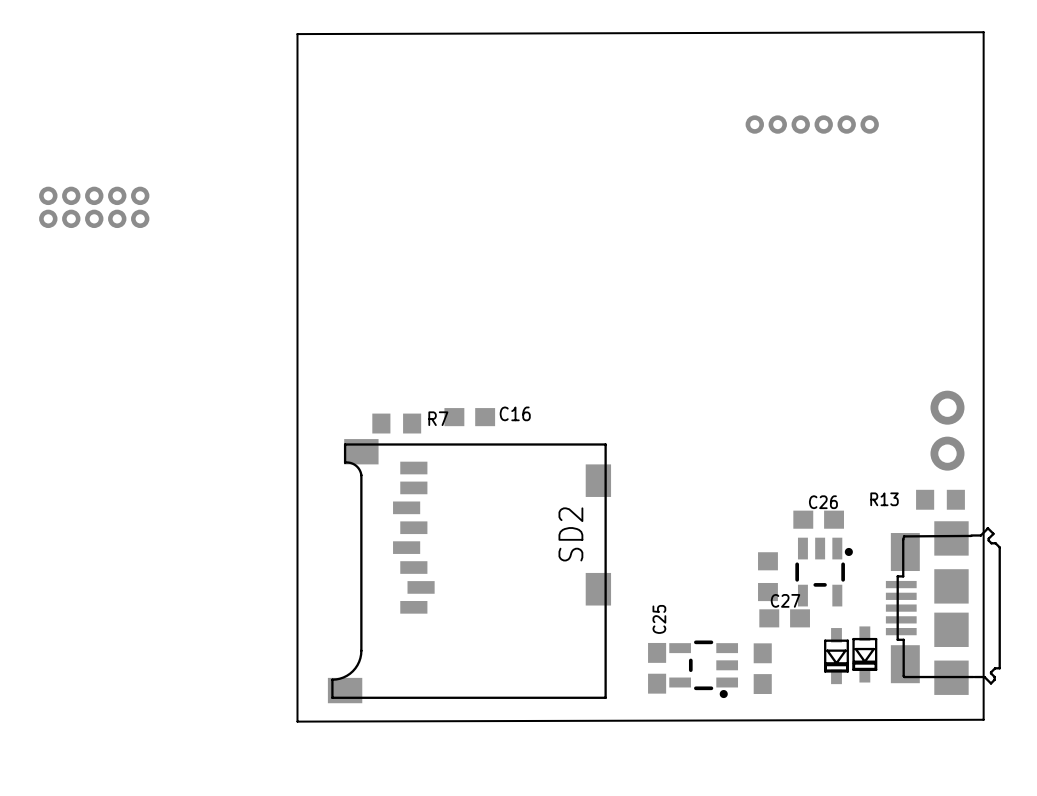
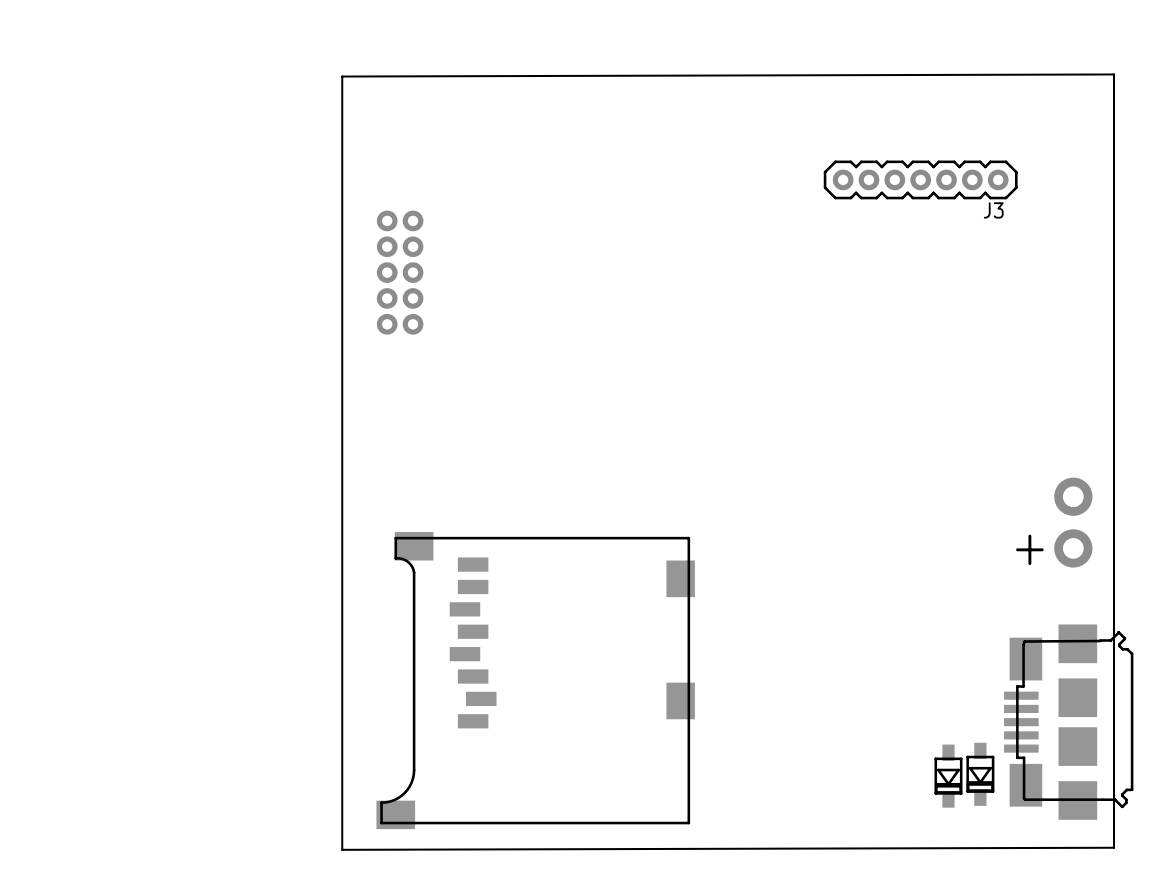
part: (812, 124) -> none
J3: none -> (920, 179)
part rotation: 0° (94, 207) -> 90° clockwise (400, 272)
part position: (94, 207) -> (400, 272)
C16: (469, 417) -> none
R7: (396, 423) -> none
text: none -> + (1029, 549)
R13: (940, 499) -> none
C26: (818, 519) -> none
SD2 name: SD2 (570, 534) -> none
part: (824, 572) -> none
part: (767, 576) -> none
C27: (784, 618) -> none
C25: (657, 668) -> none
part: (762, 668) -> none
part: (703, 669) -> none

